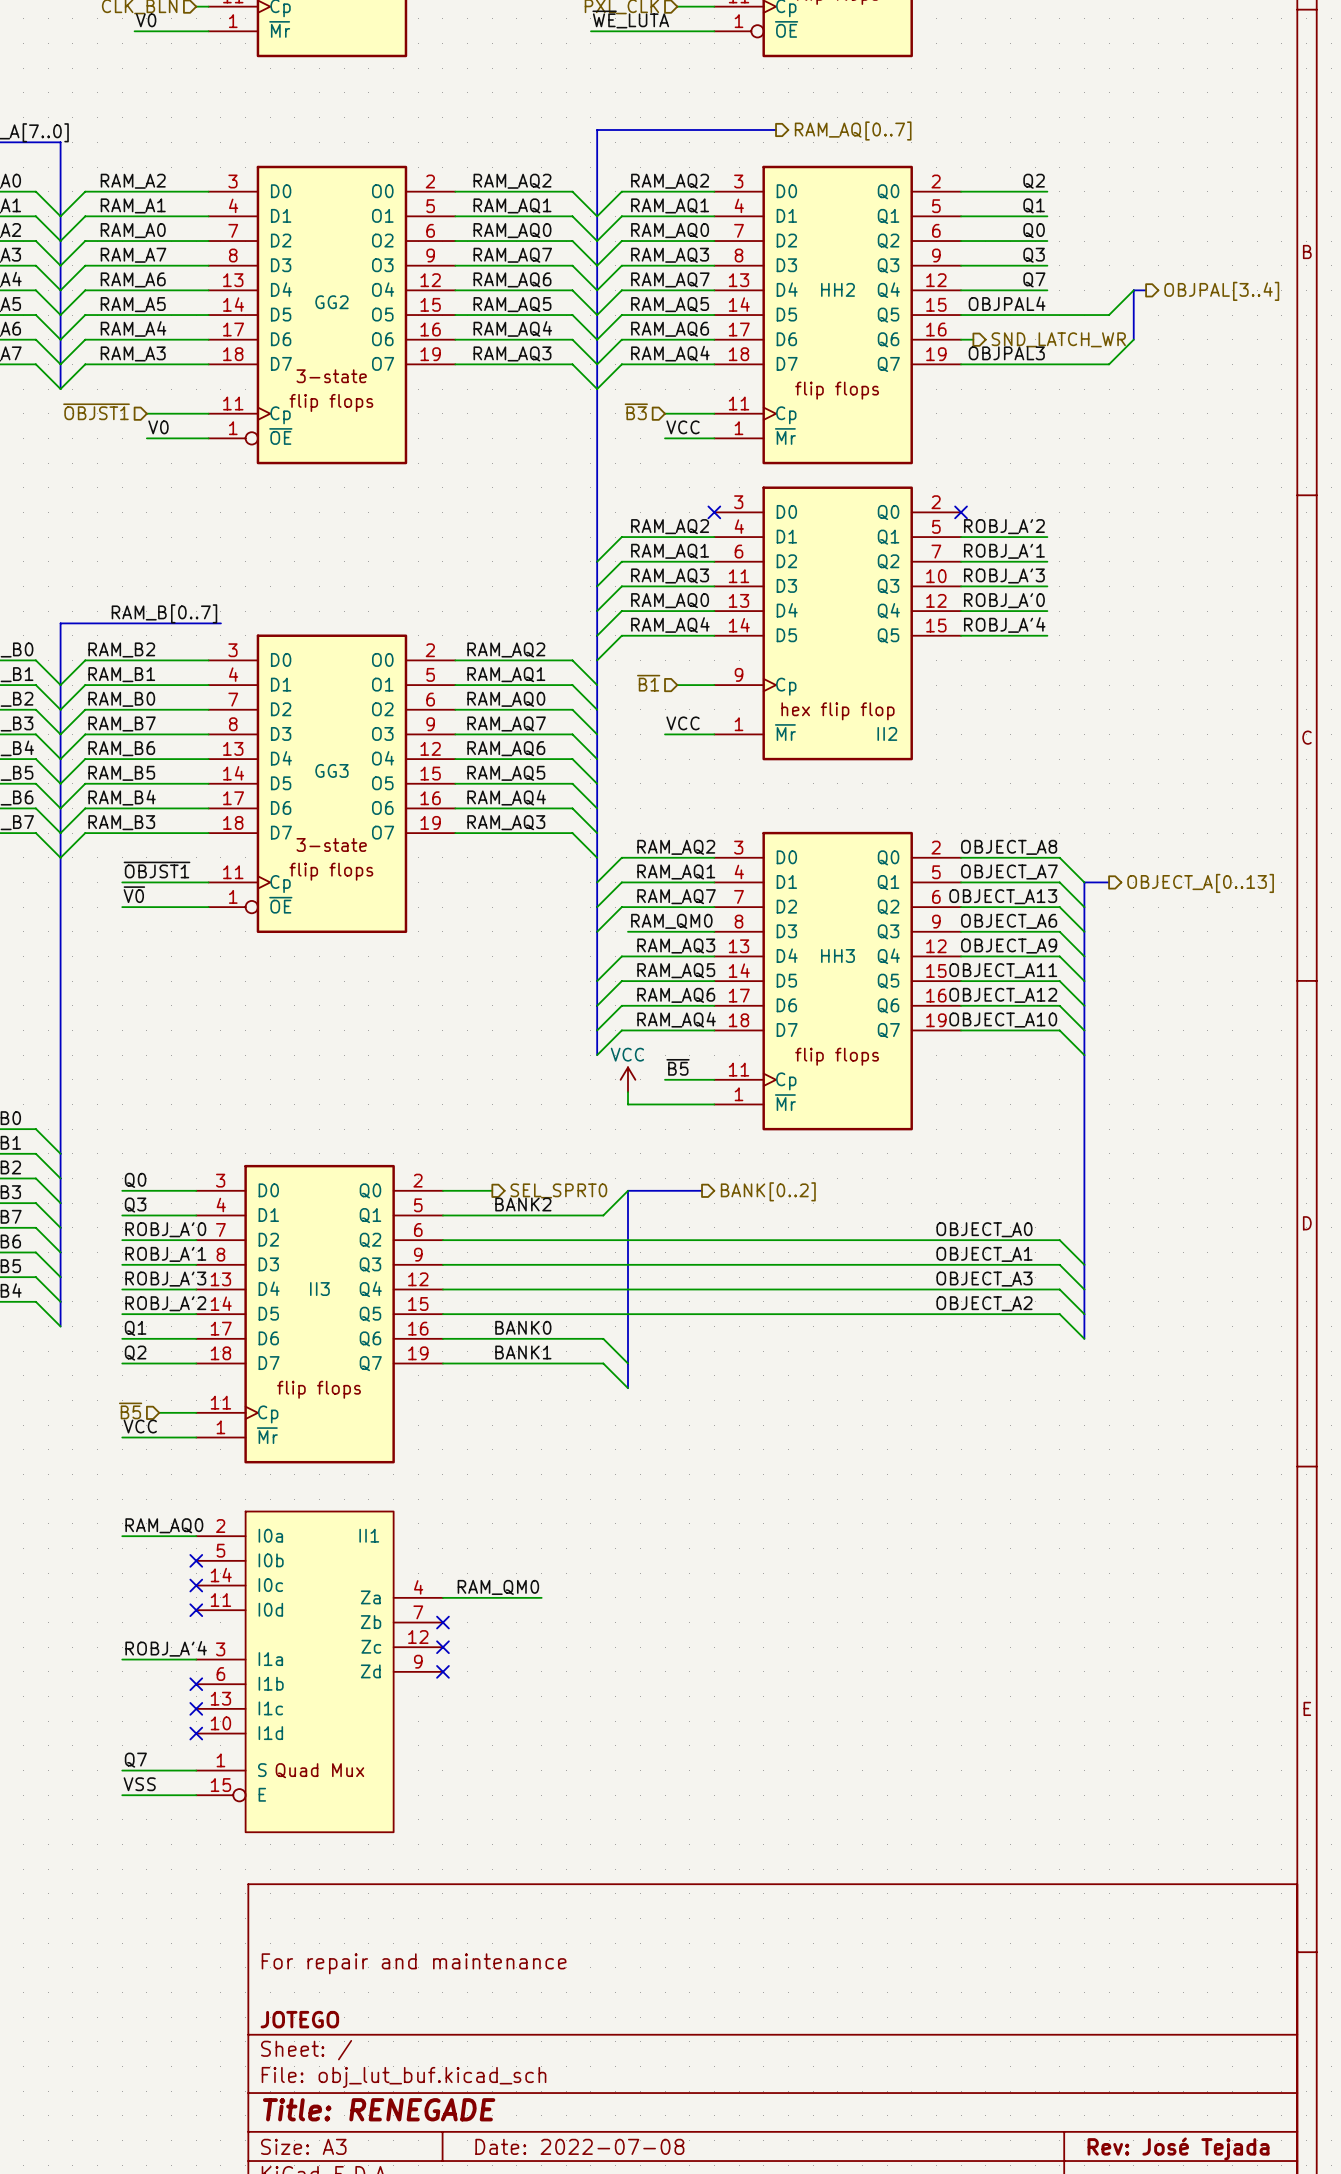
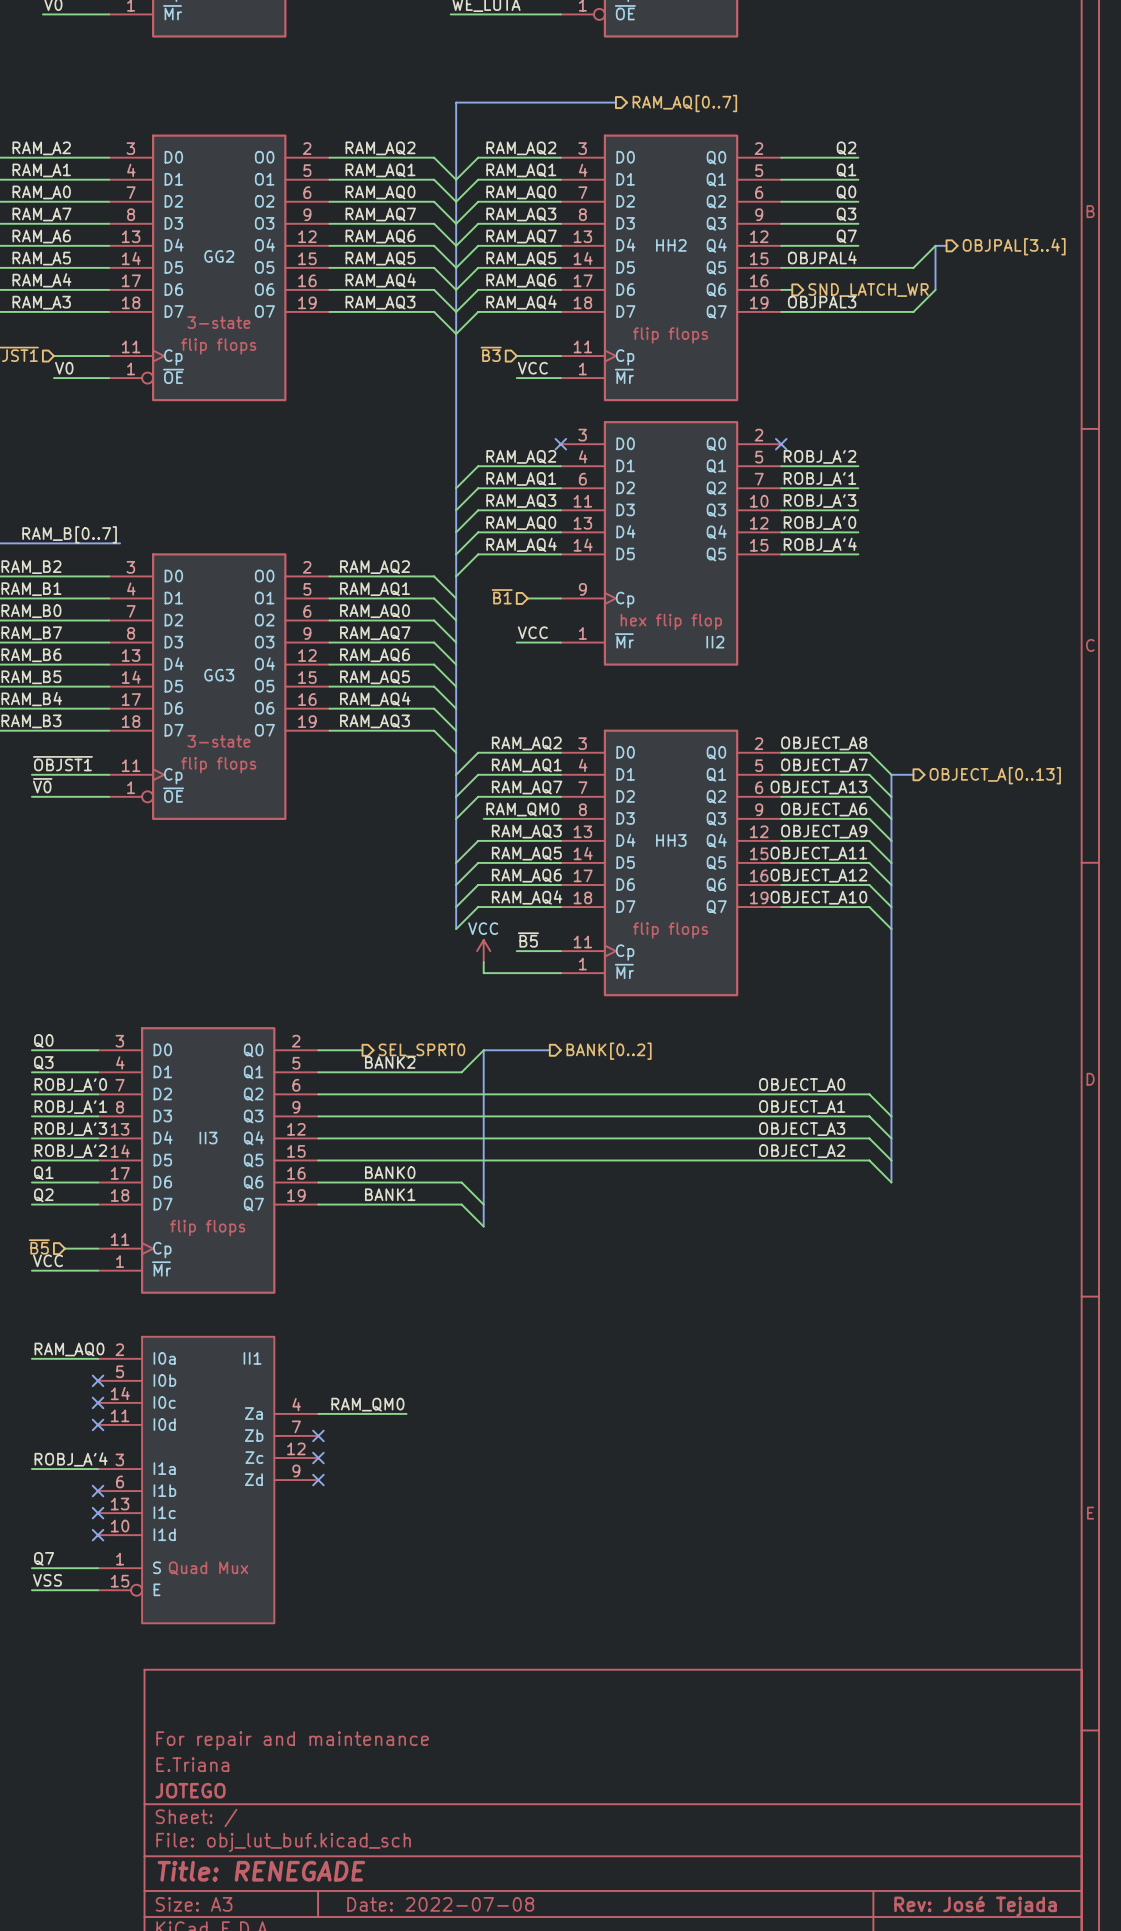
title block: none -> E.Triana (192, 1764)

